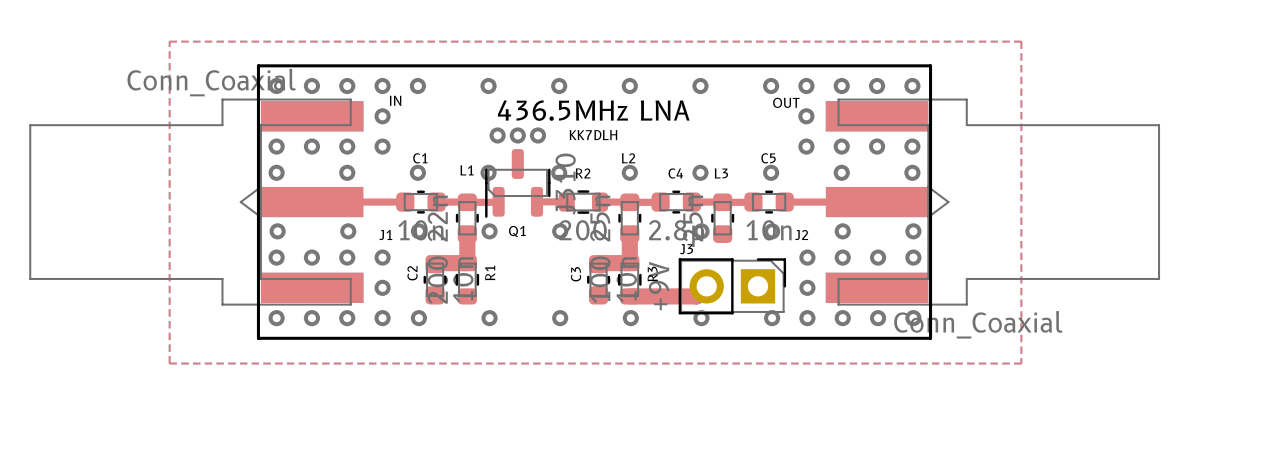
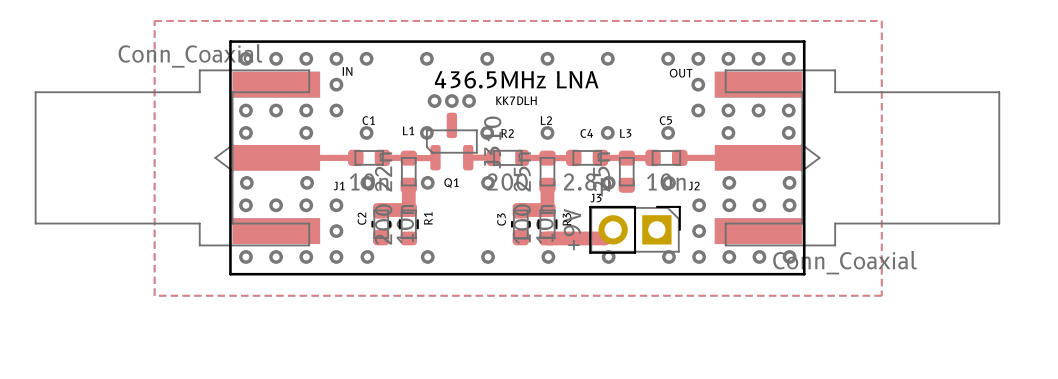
Q1 footprint: [485, 149, 551, 218] -> [426, 112, 478, 171]
C1 footprint: [396, 190, 446, 214] -> [348, 149, 391, 167]
R2 footprint: [558, 190, 609, 214] -> [486, 149, 529, 167]
C4 footprint: [651, 190, 701, 214] -> [566, 149, 609, 167]
C5 footprint: [744, 190, 794, 214] -> [645, 149, 688, 167]
L1 footprint: [455, 193, 479, 243] -> [400, 150, 417, 193]
L2 footprint: [618, 193, 642, 243] -> [539, 150, 556, 193]
L3 footprint: [711, 193, 735, 243] -> [618, 150, 635, 193]

